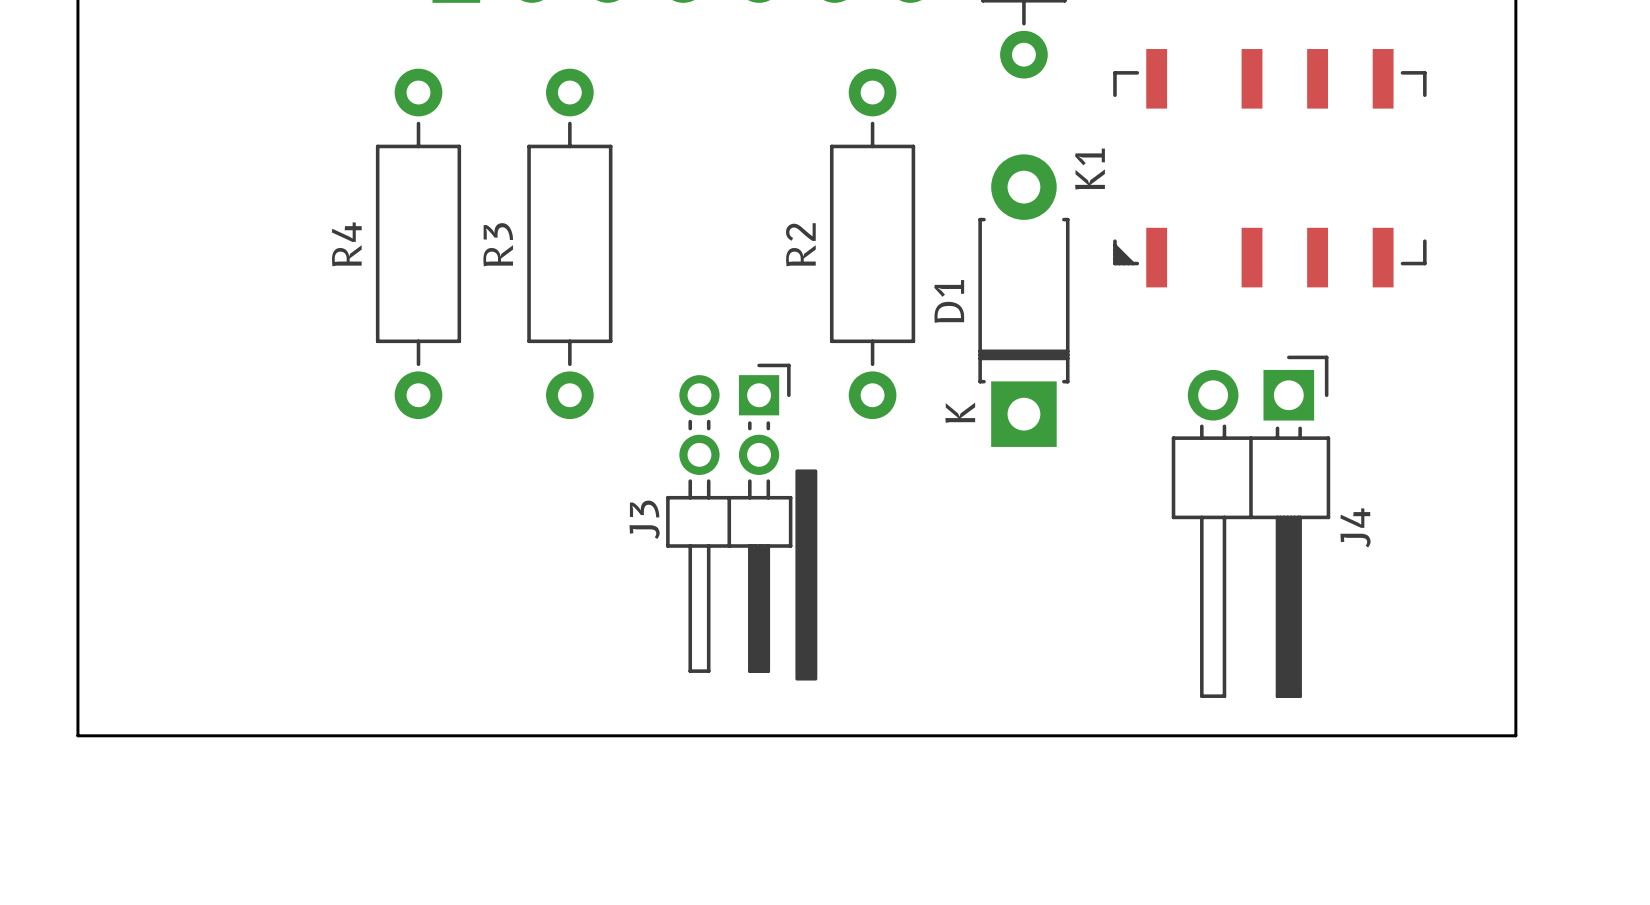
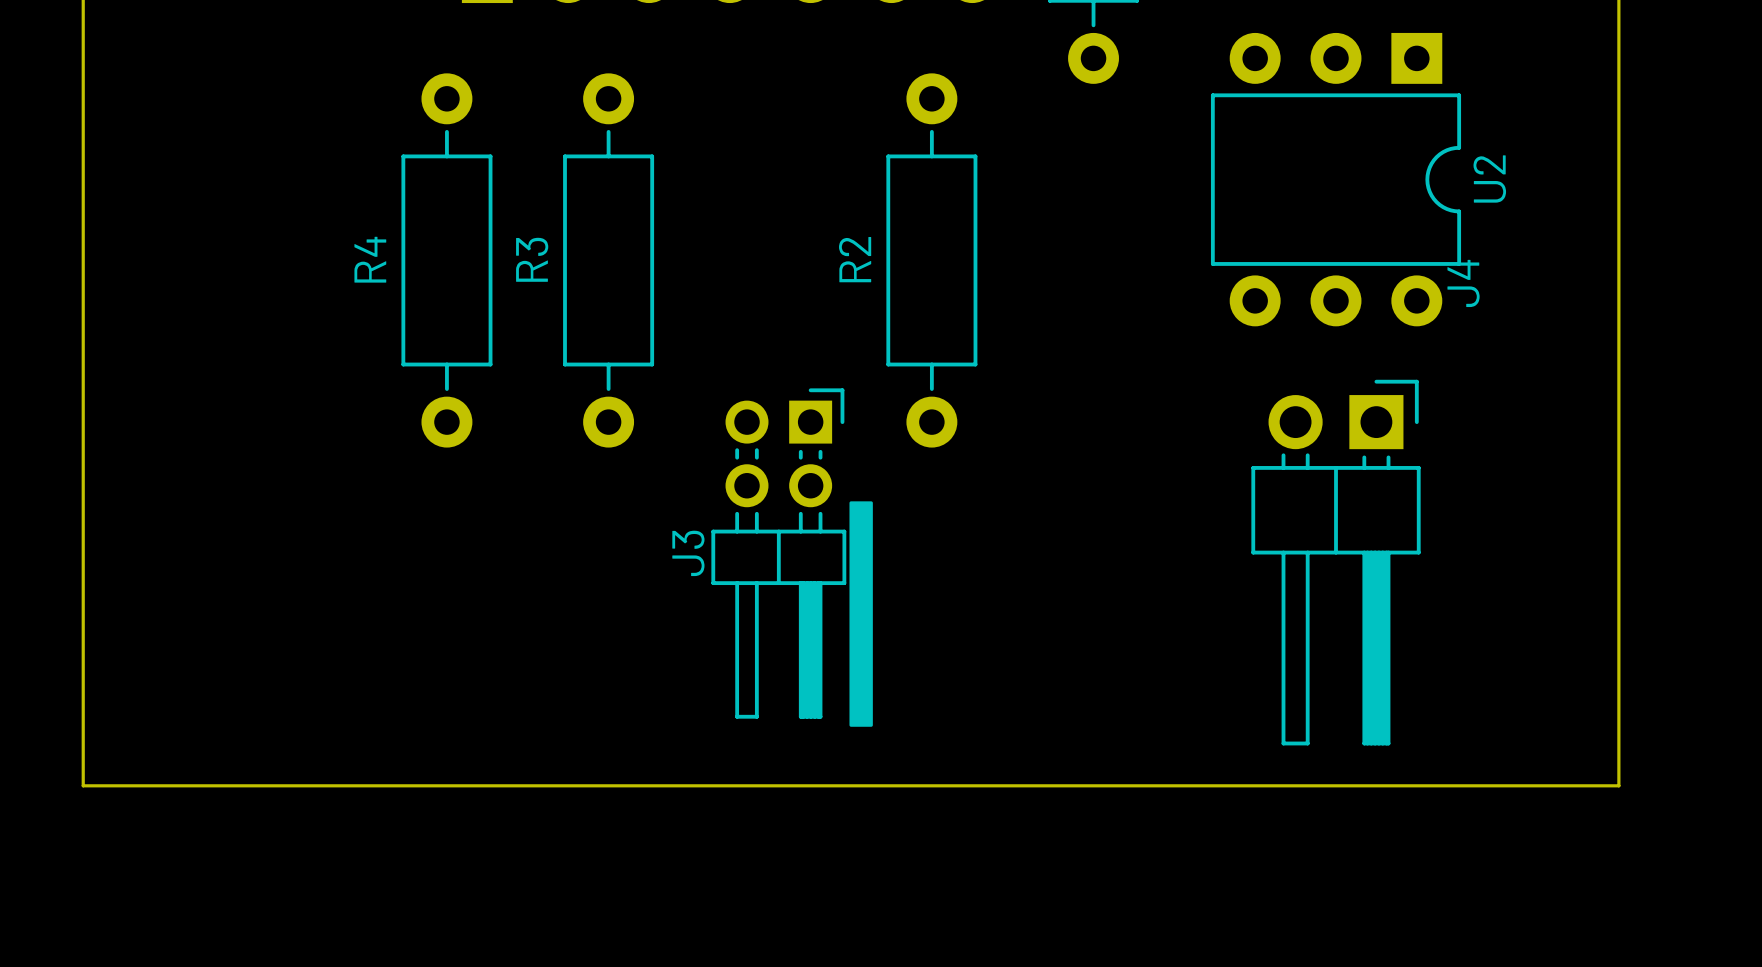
U2: none -> (1336, 179)
K1: (1269, 168) -> none
D1: (1023, 300) -> none
J4 name position: J4 (1355, 527) -> J4 (1463, 283)

